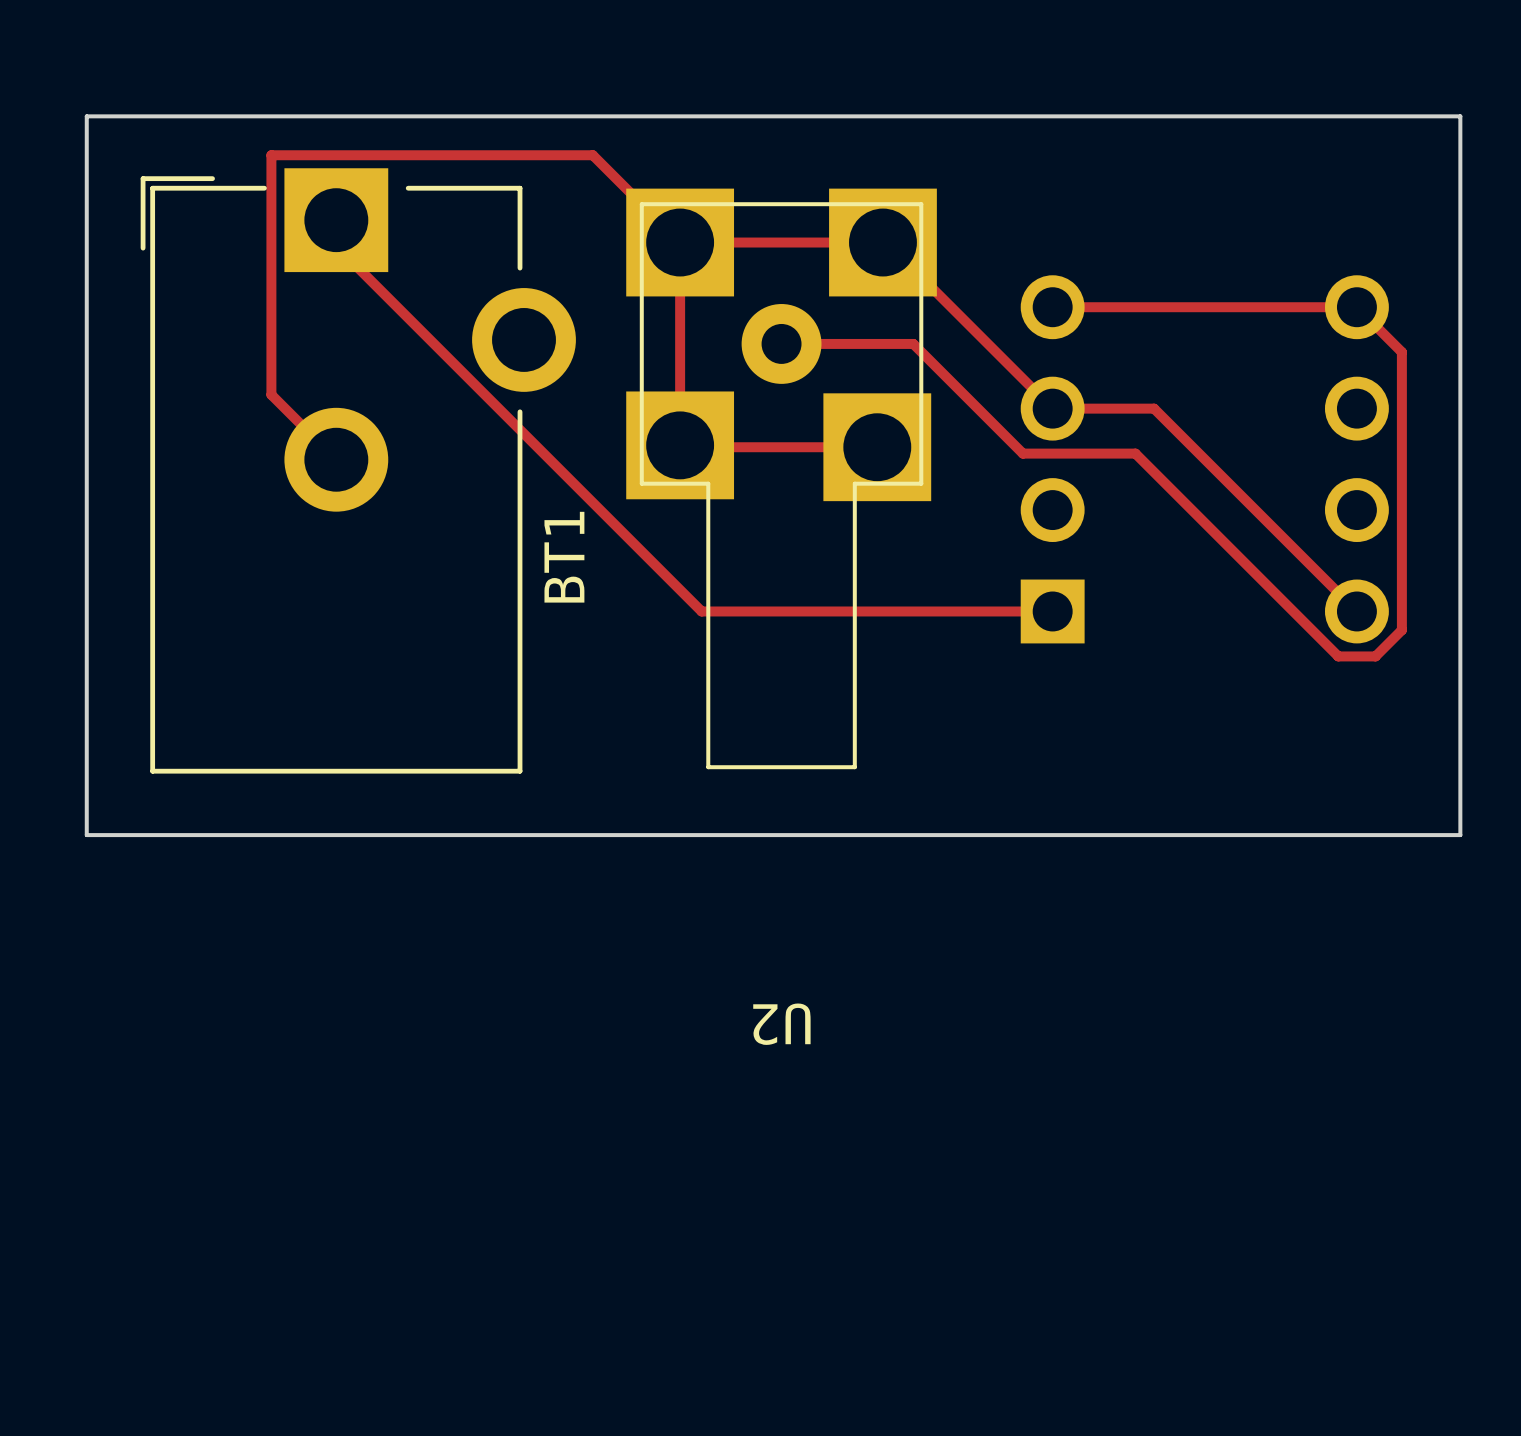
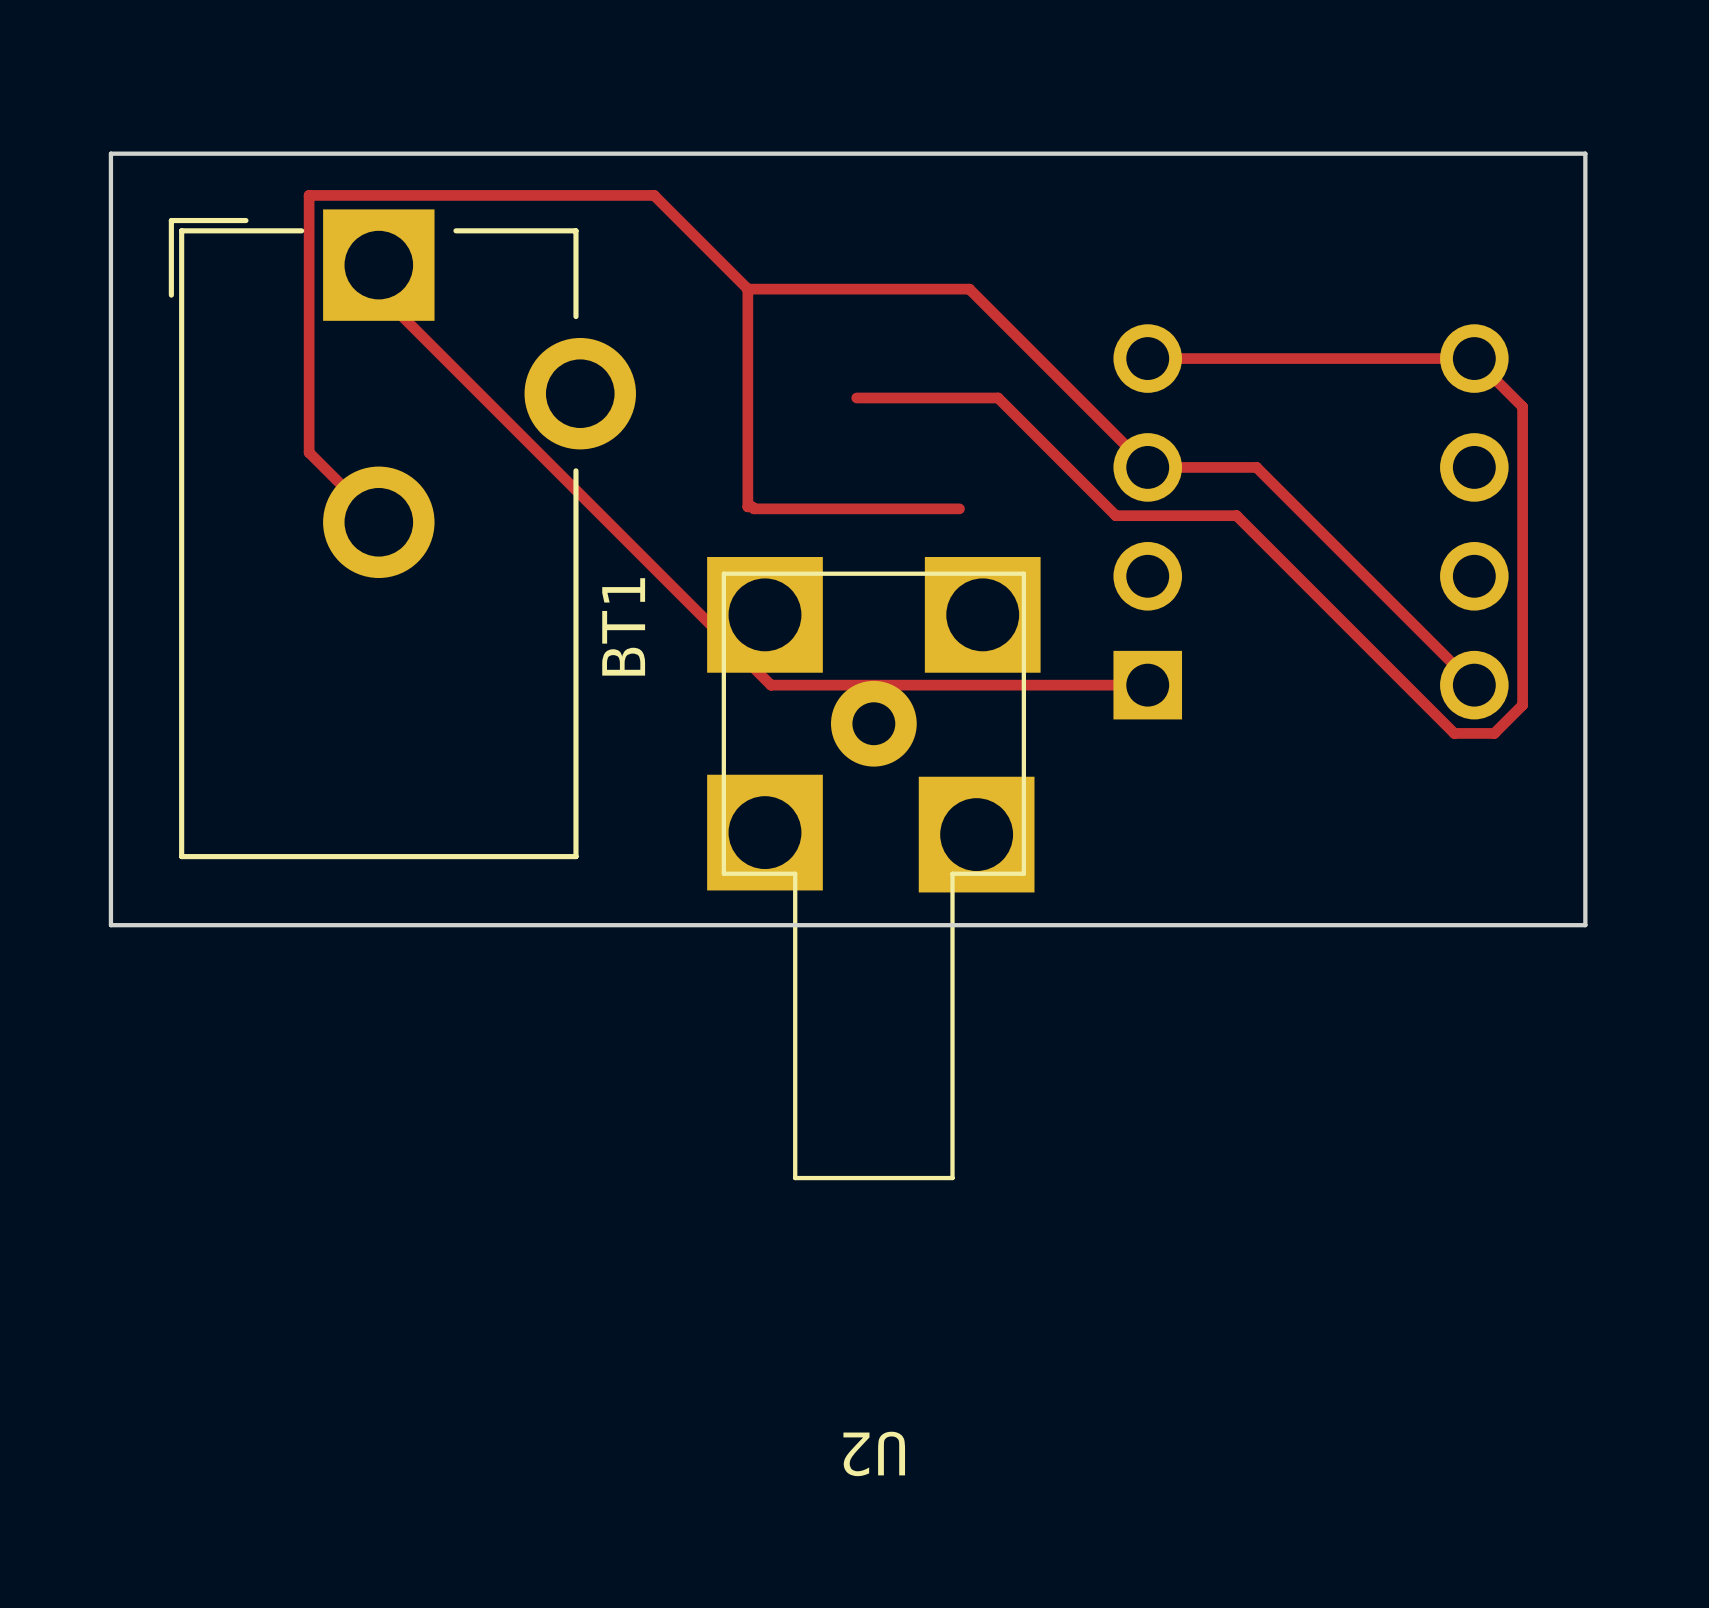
U2 position: (781, 478) -> (873, 868)

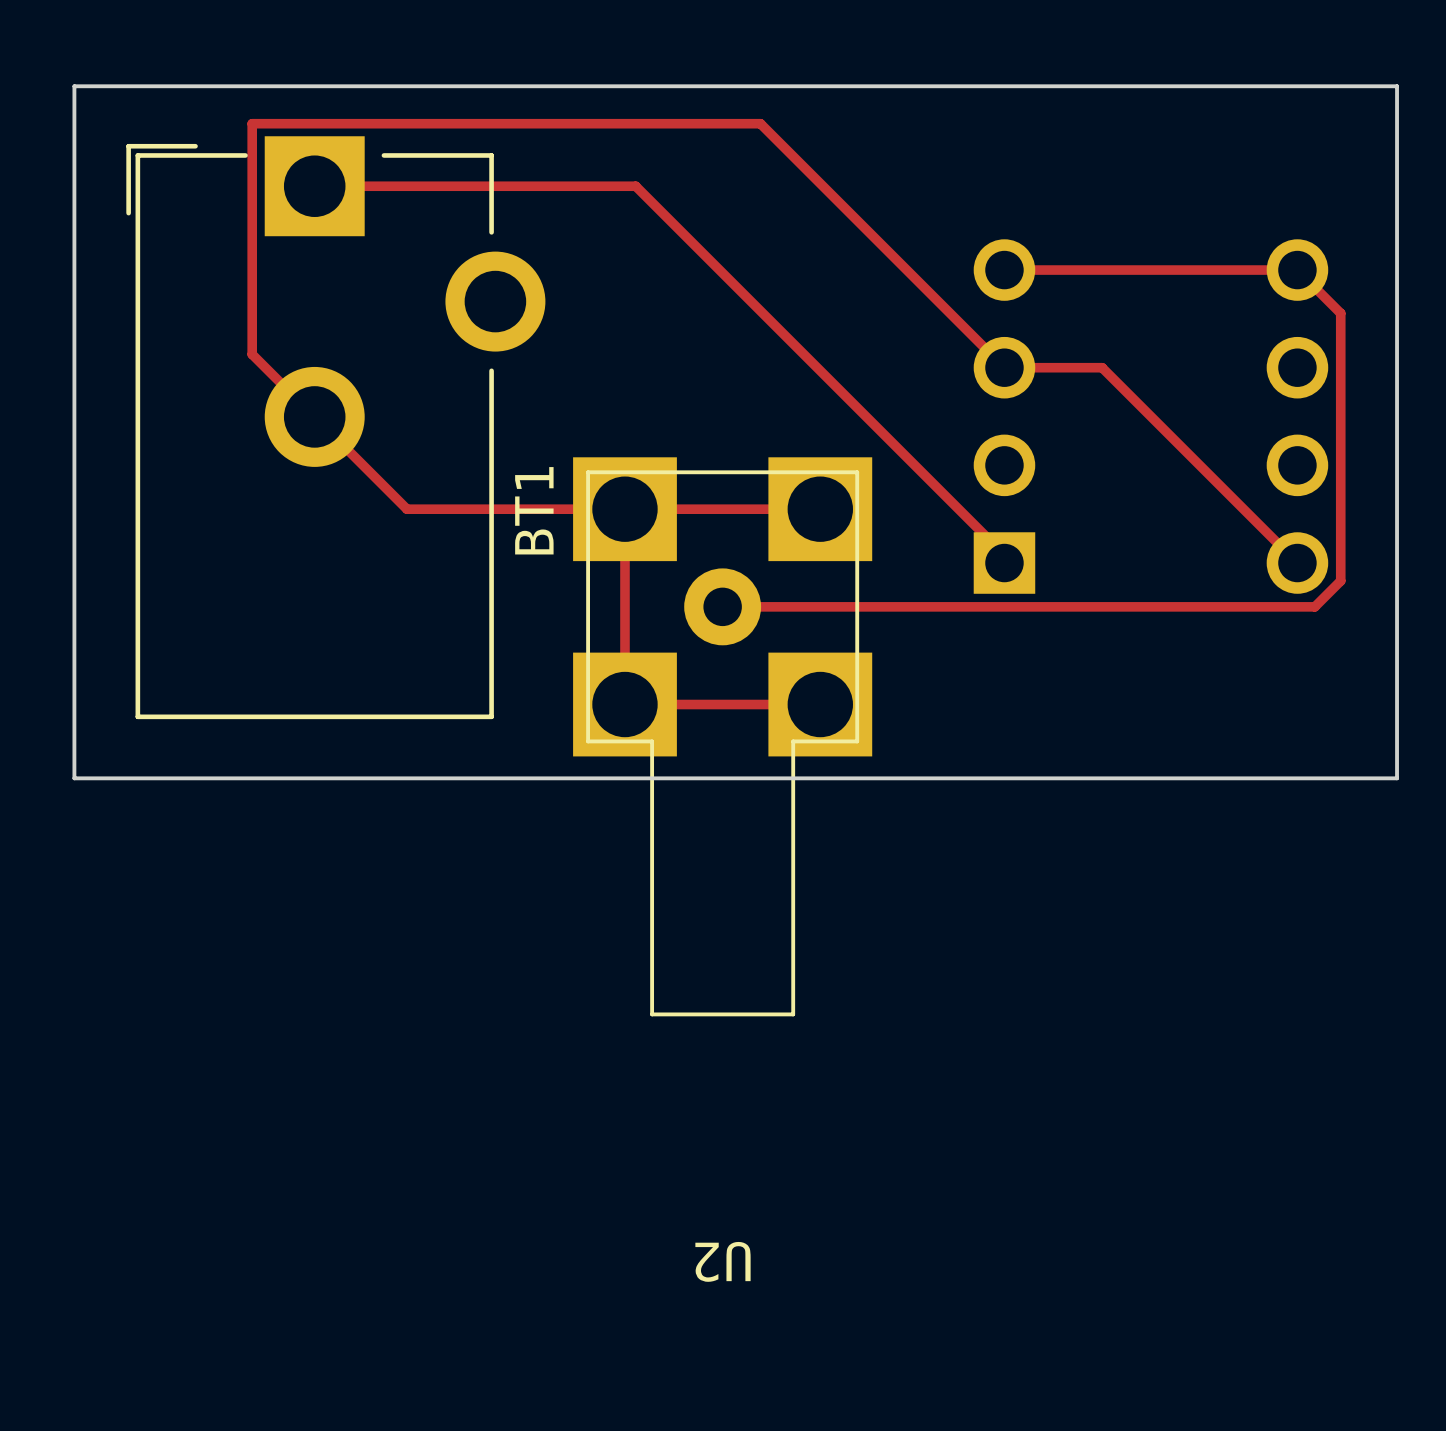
track: (654, 195) (747, 289) -> none
track: (747, 289) (969, 289) -> (561, 123) (760, 123) (844, 207)
track: (747, 289) (747, 506) (754, 508) (959, 508) -> none
track: (378, 292) (770, 685) (1147, 685) -> (314, 186) (635, 186) (1004, 554) (1004, 563)
track: (856, 397) (998, 397) (1115, 515) (1236, 515) (1454, 733) (1494, 733) -> (722, 606) (1314, 606)
track: none -> (314, 416) (406, 509) (820, 509)
U2 footprint: [707, 557, 1041, 1181] -> [573, 457, 873, 1017]
track: none -> (624, 509) (624, 704)
track: none -> (602, 704) (820, 704)
U2 name position: U2 (874, 1453) -> U2 (723, 1261)

